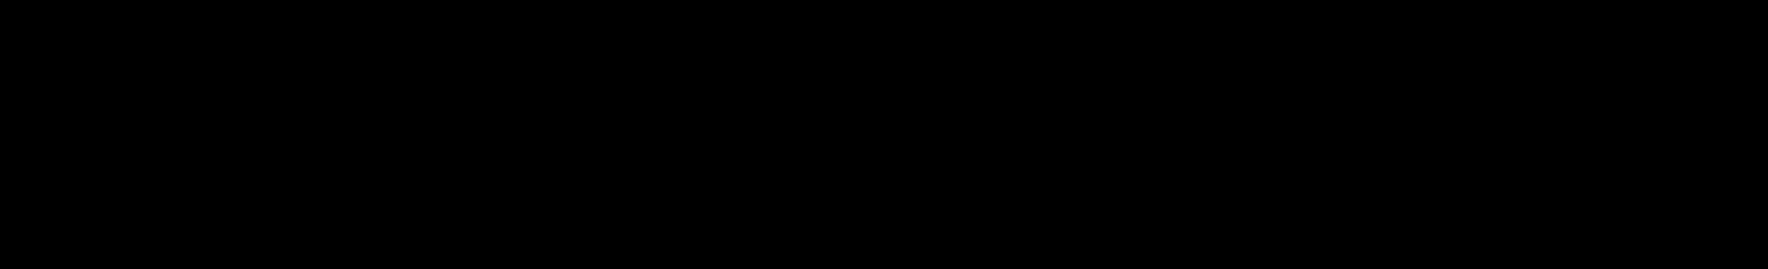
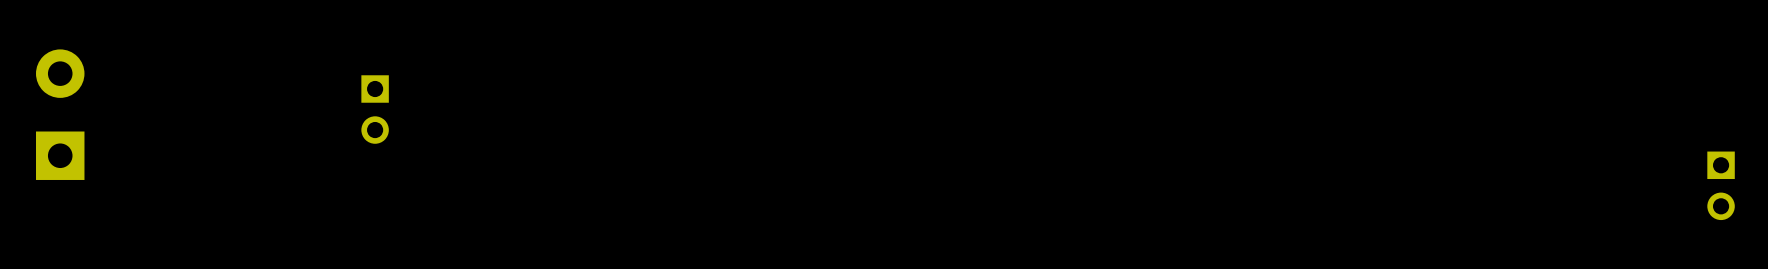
part: none -> (375, 109)
part: none -> (60, 114)
part: none -> (1721, 185)

